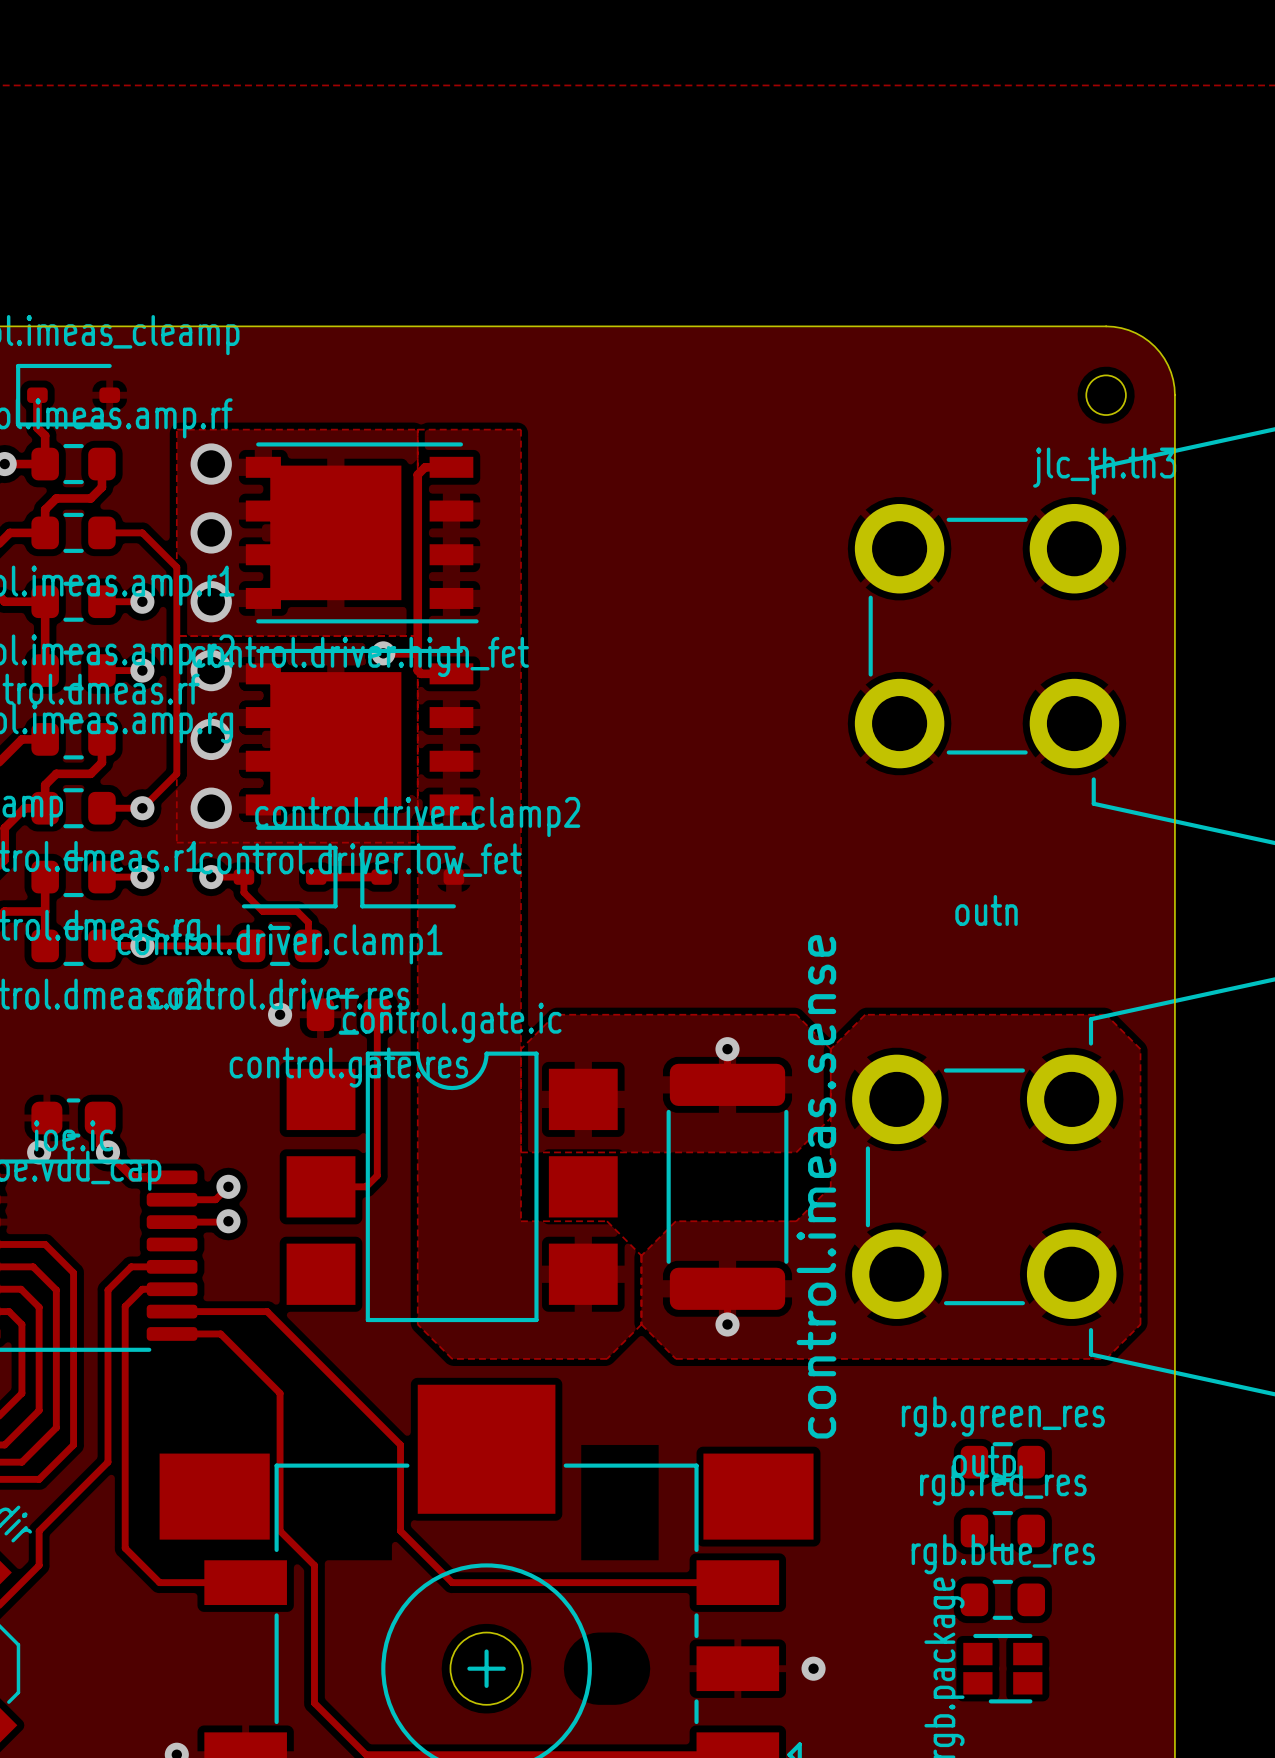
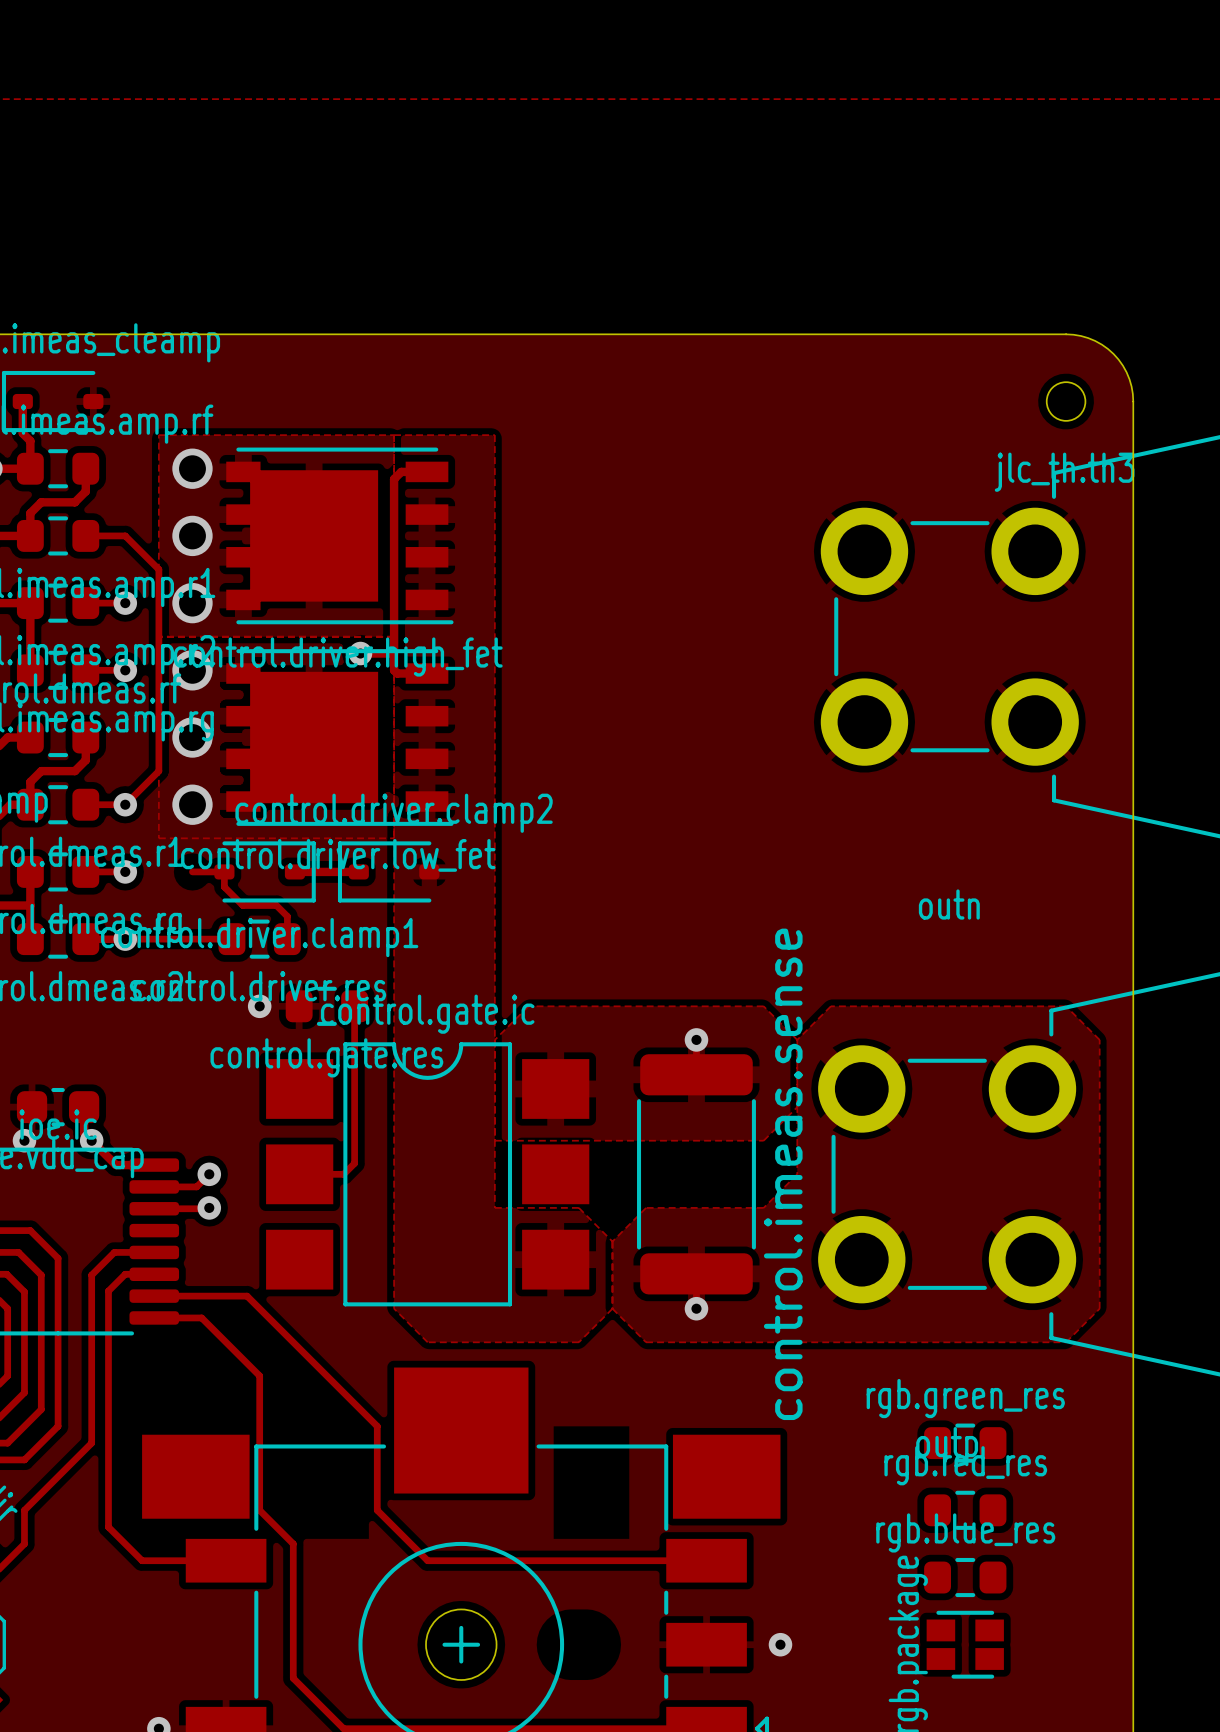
via: (211, 877) -> none

